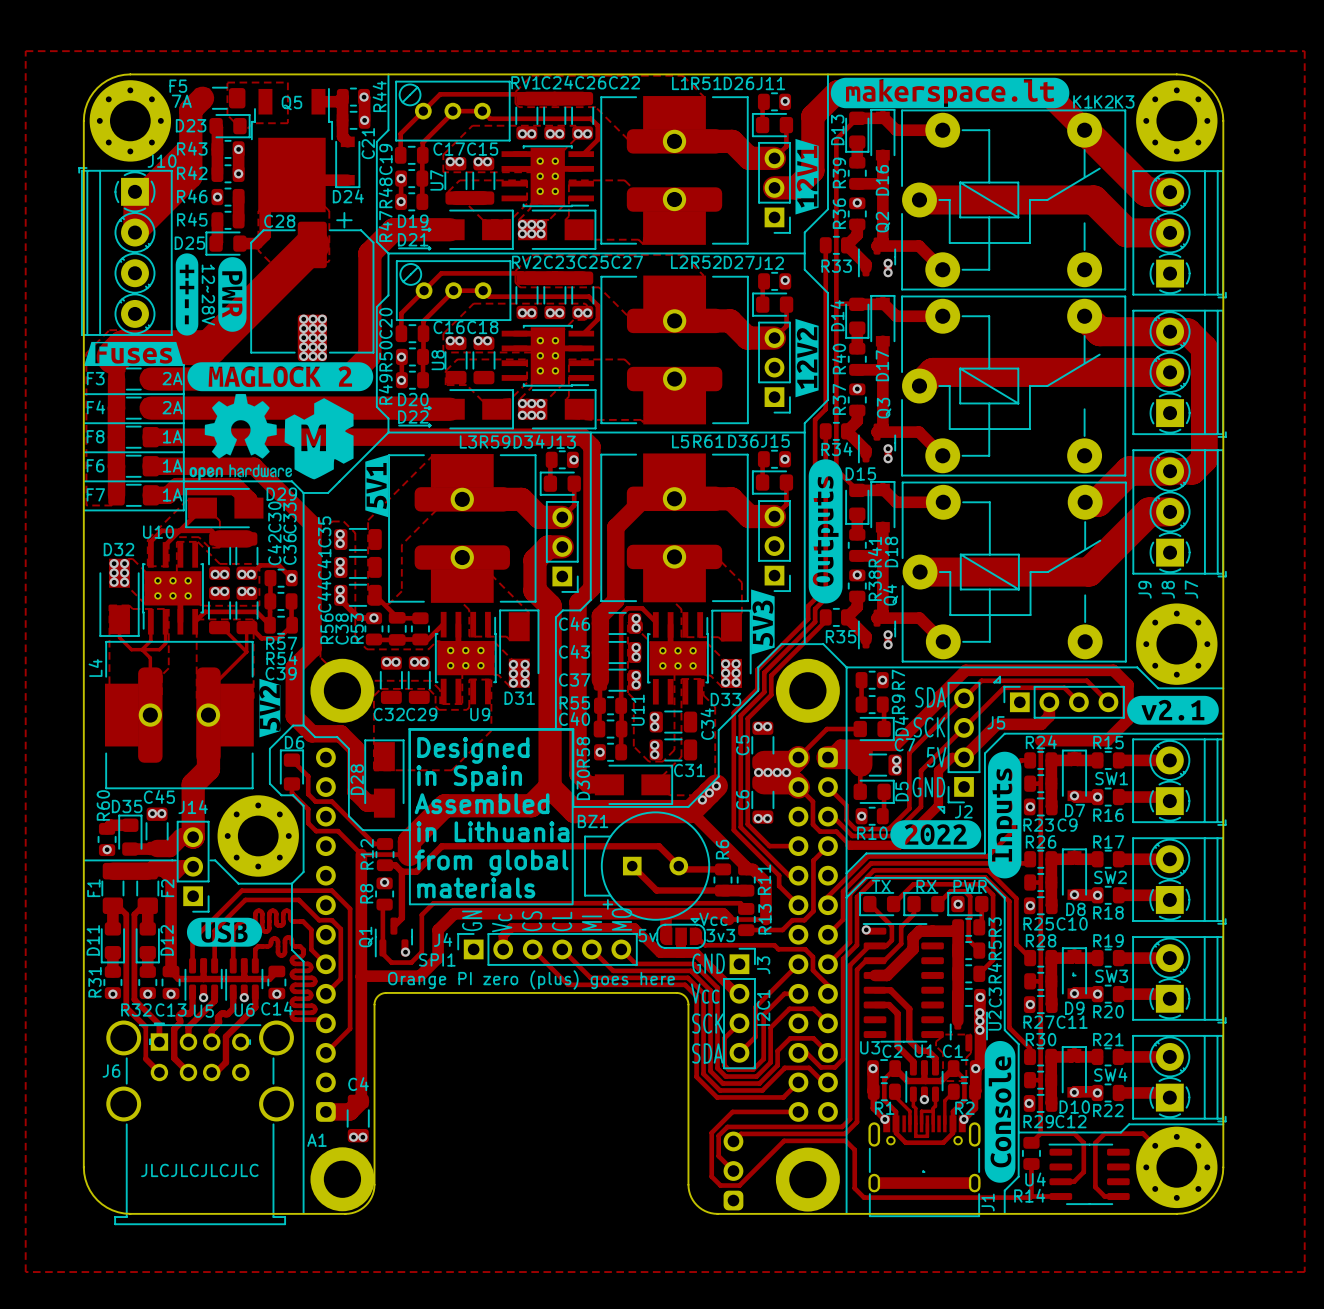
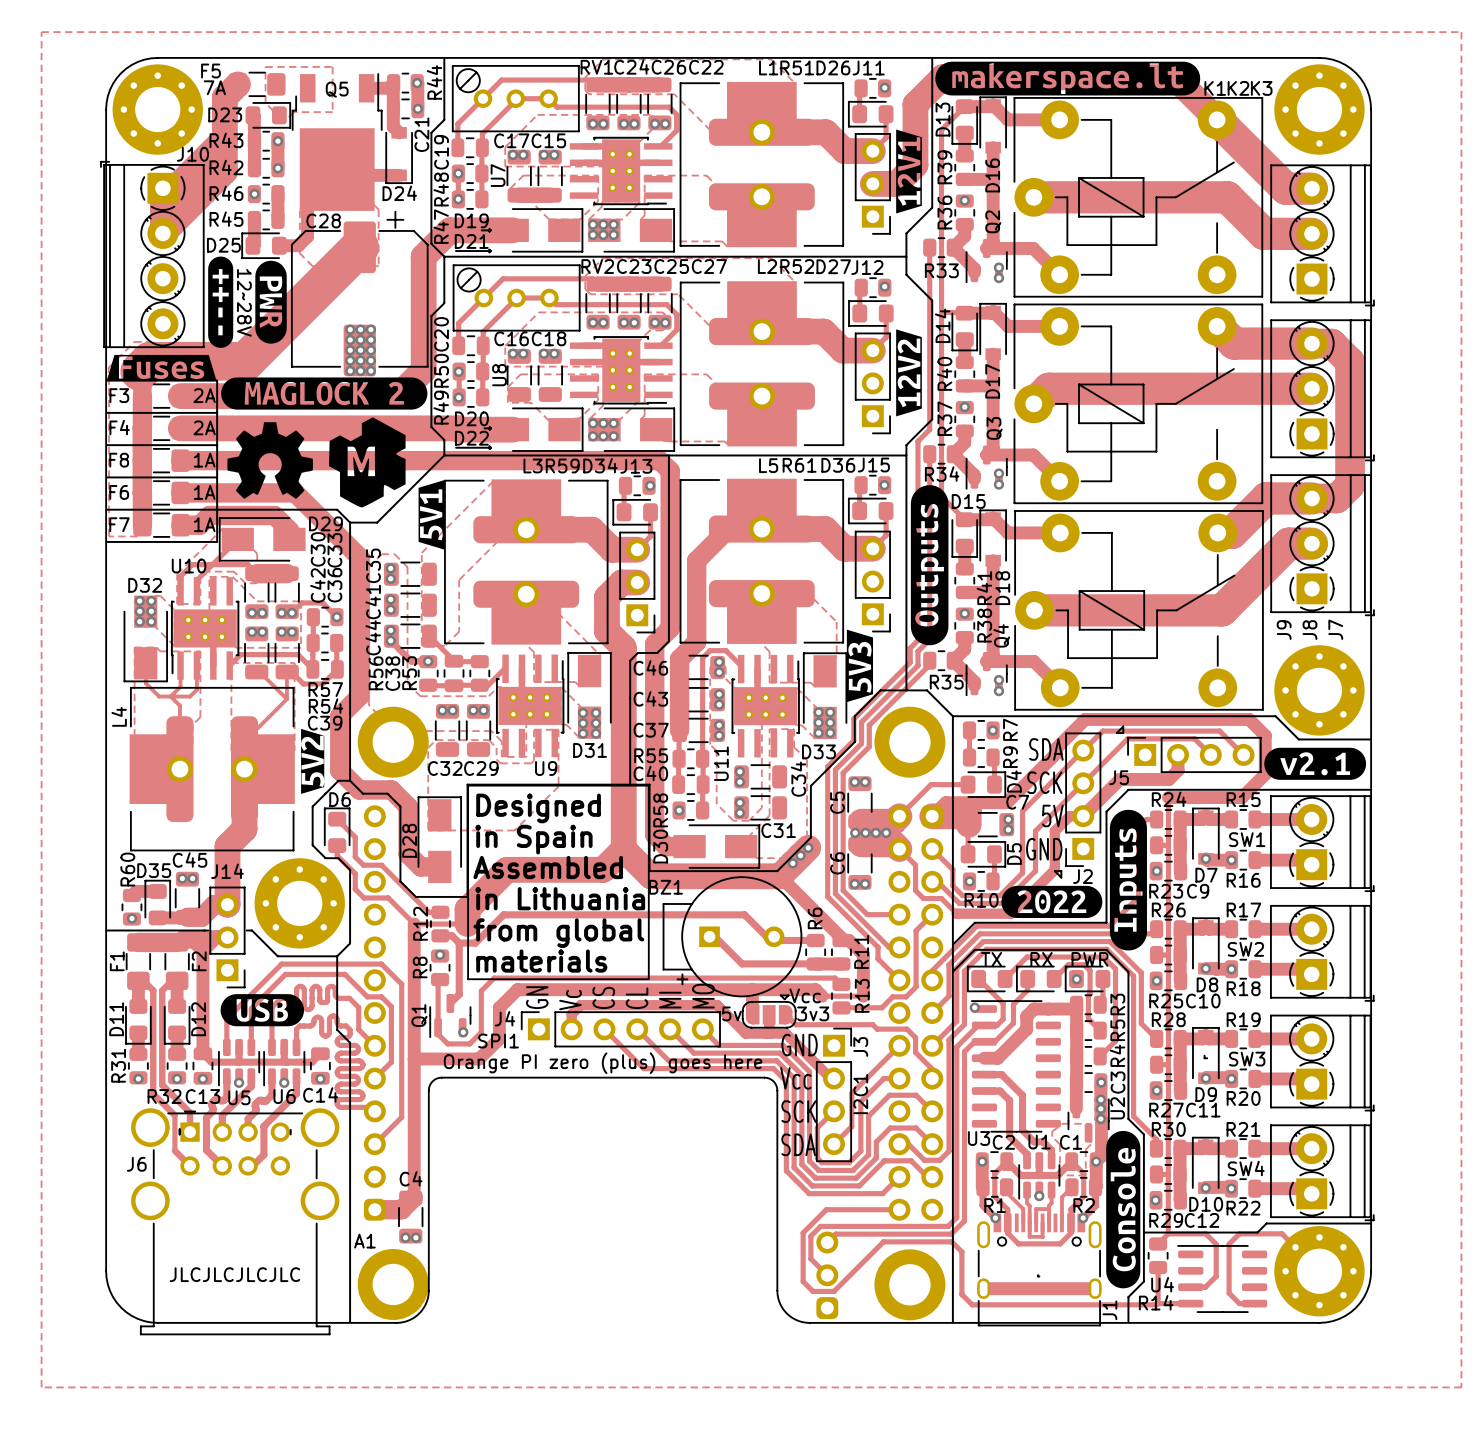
drawing shape: [189, 393, 292, 481] -> [227, 422, 313, 499]
BZ1 footprint: [584, 811, 710, 921] -> [662, 876, 803, 998]

